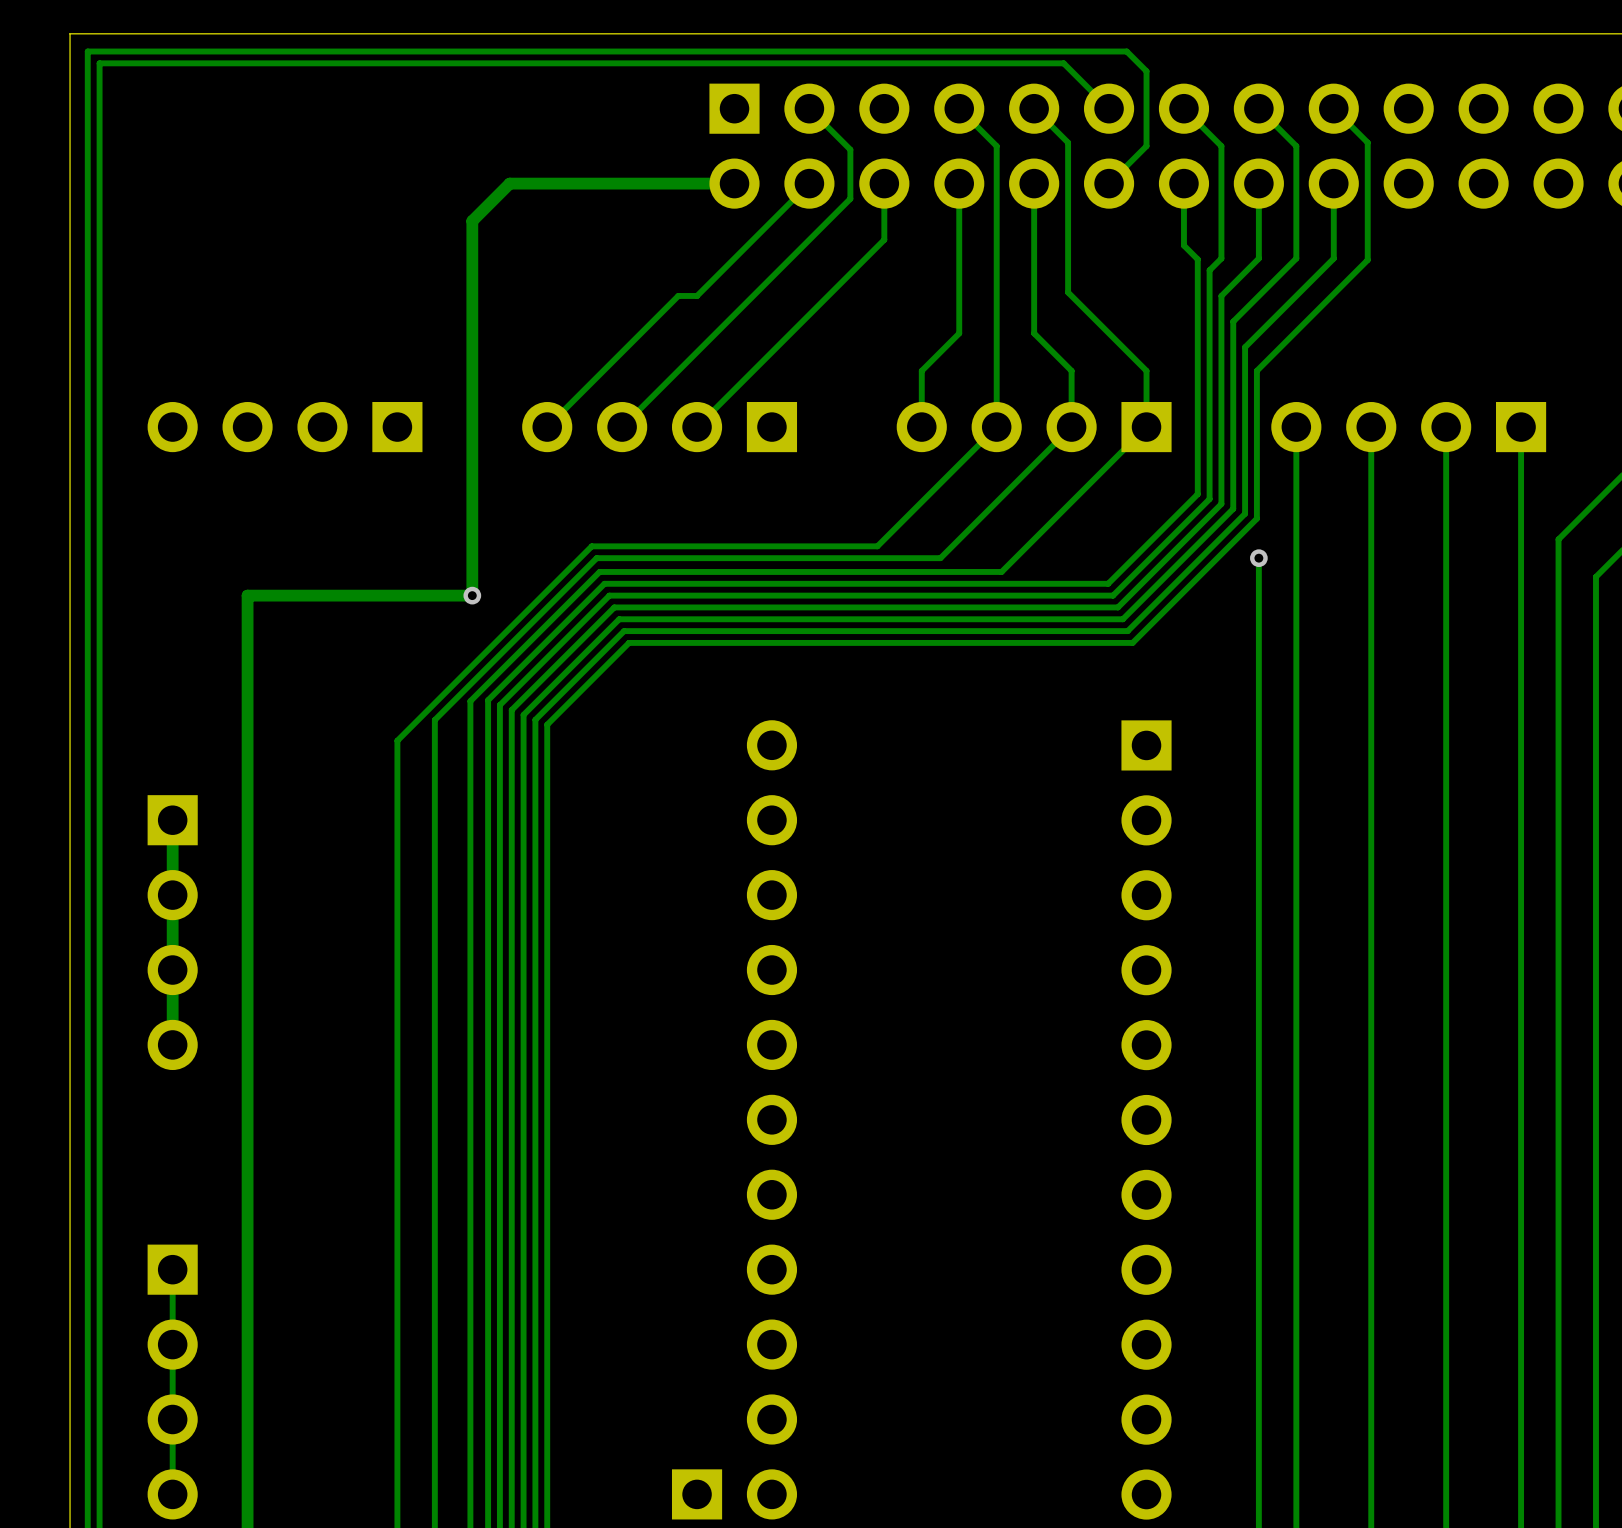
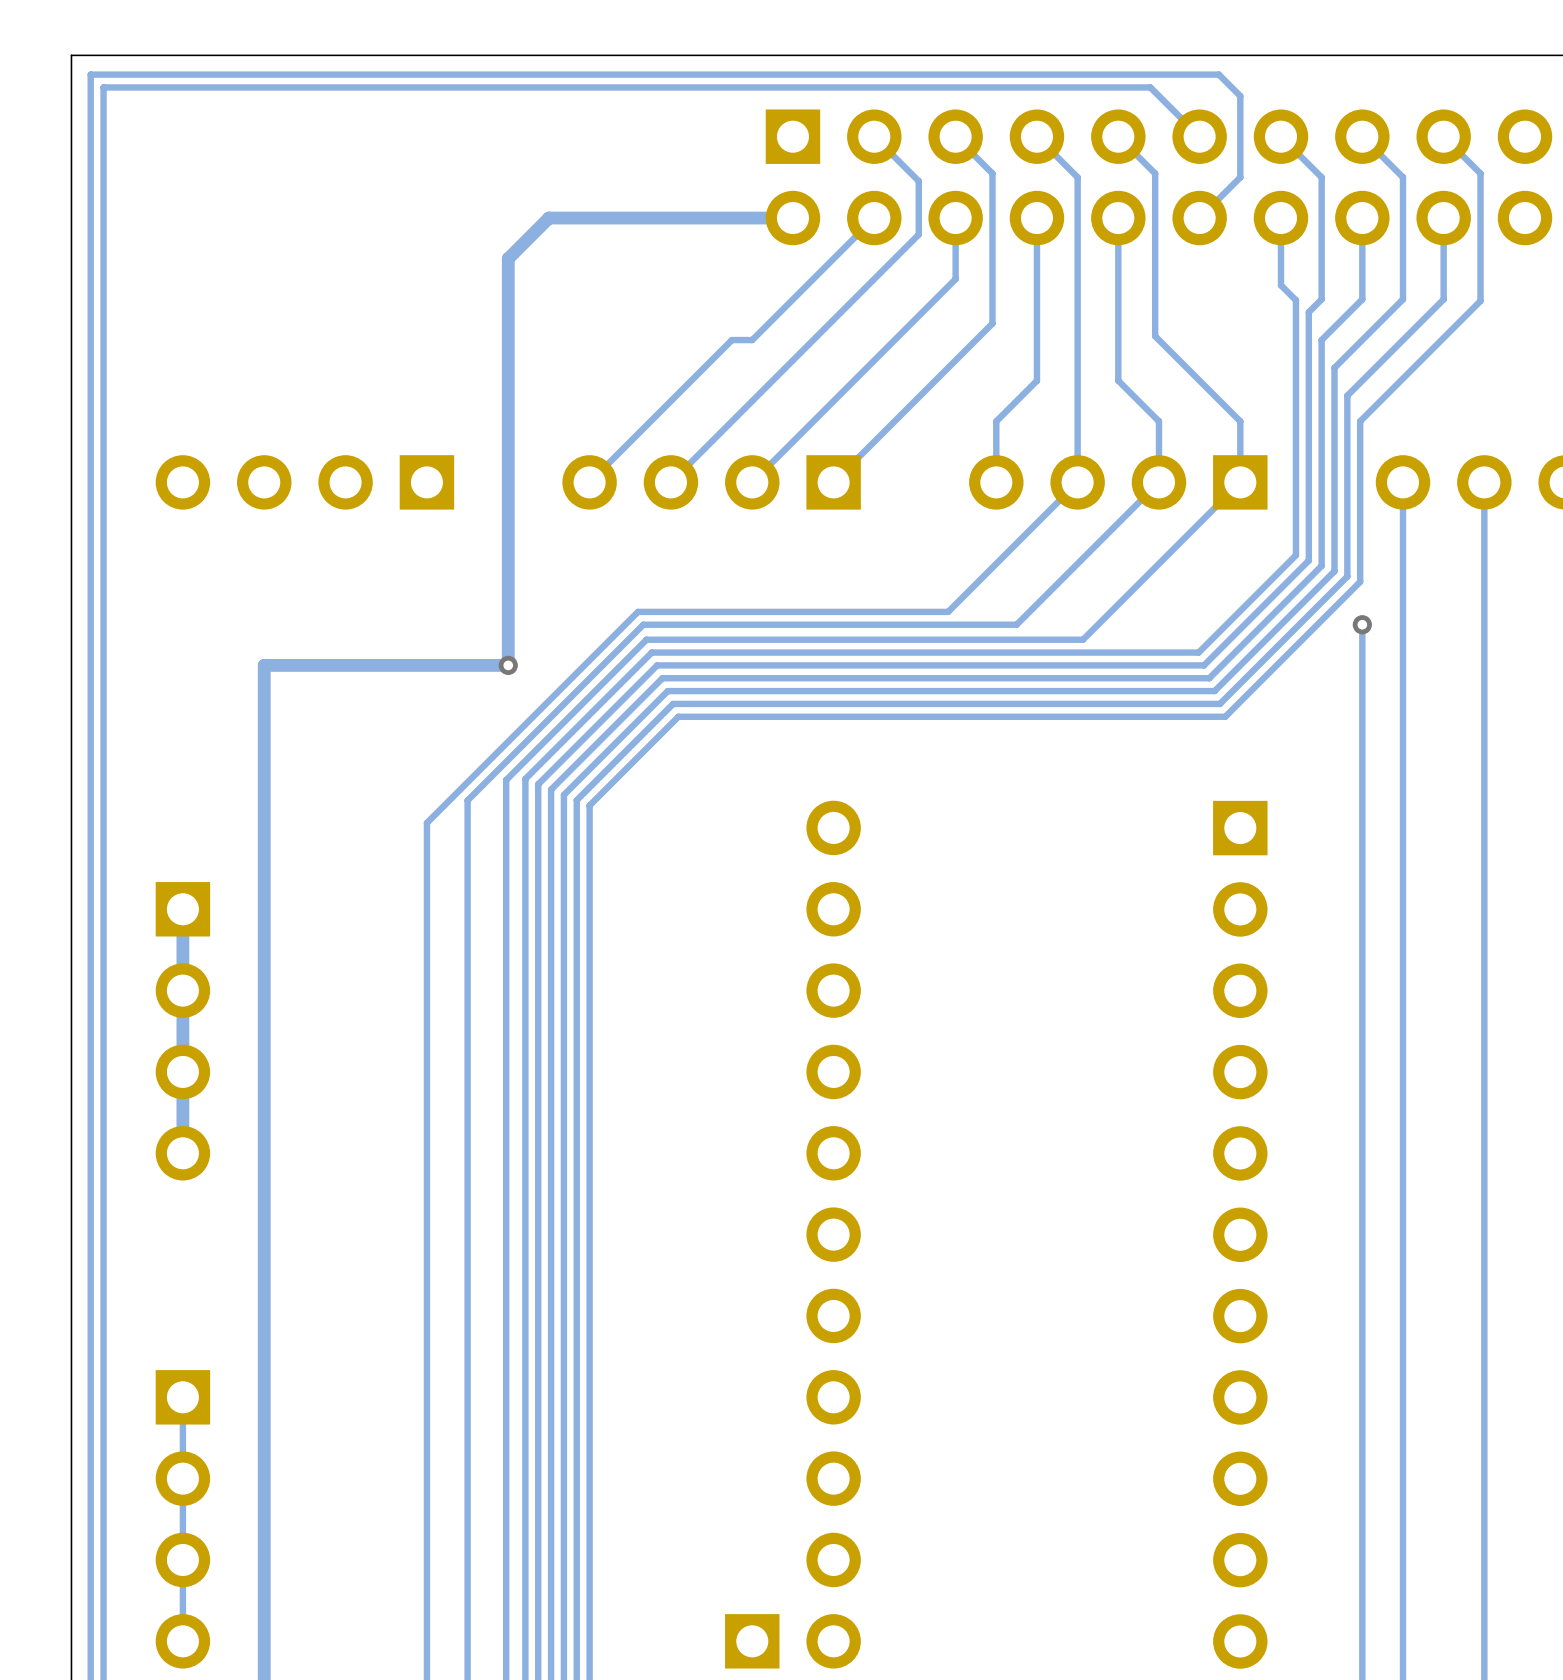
track: none -> (955, 136) (992, 173) (992, 323) (833, 482)

